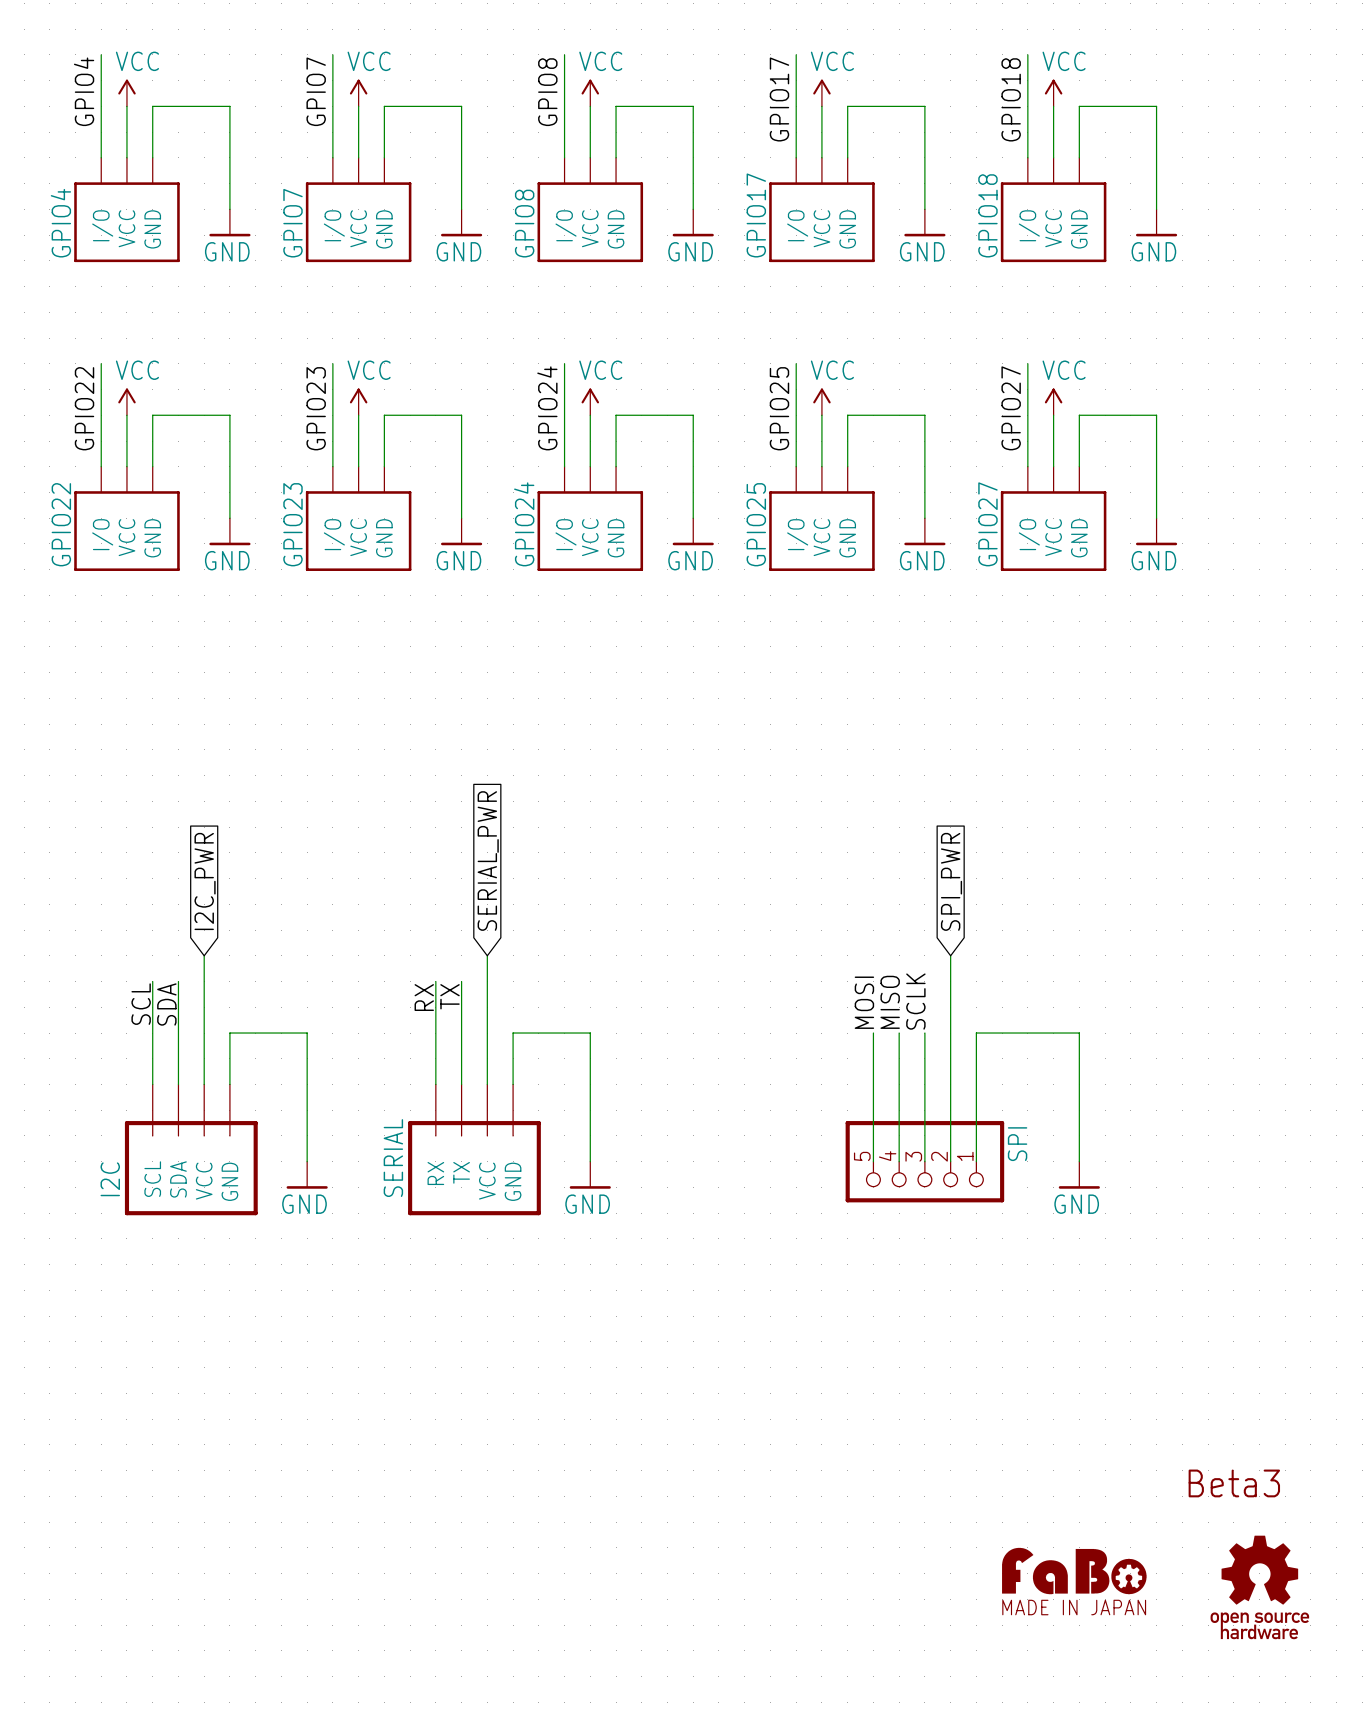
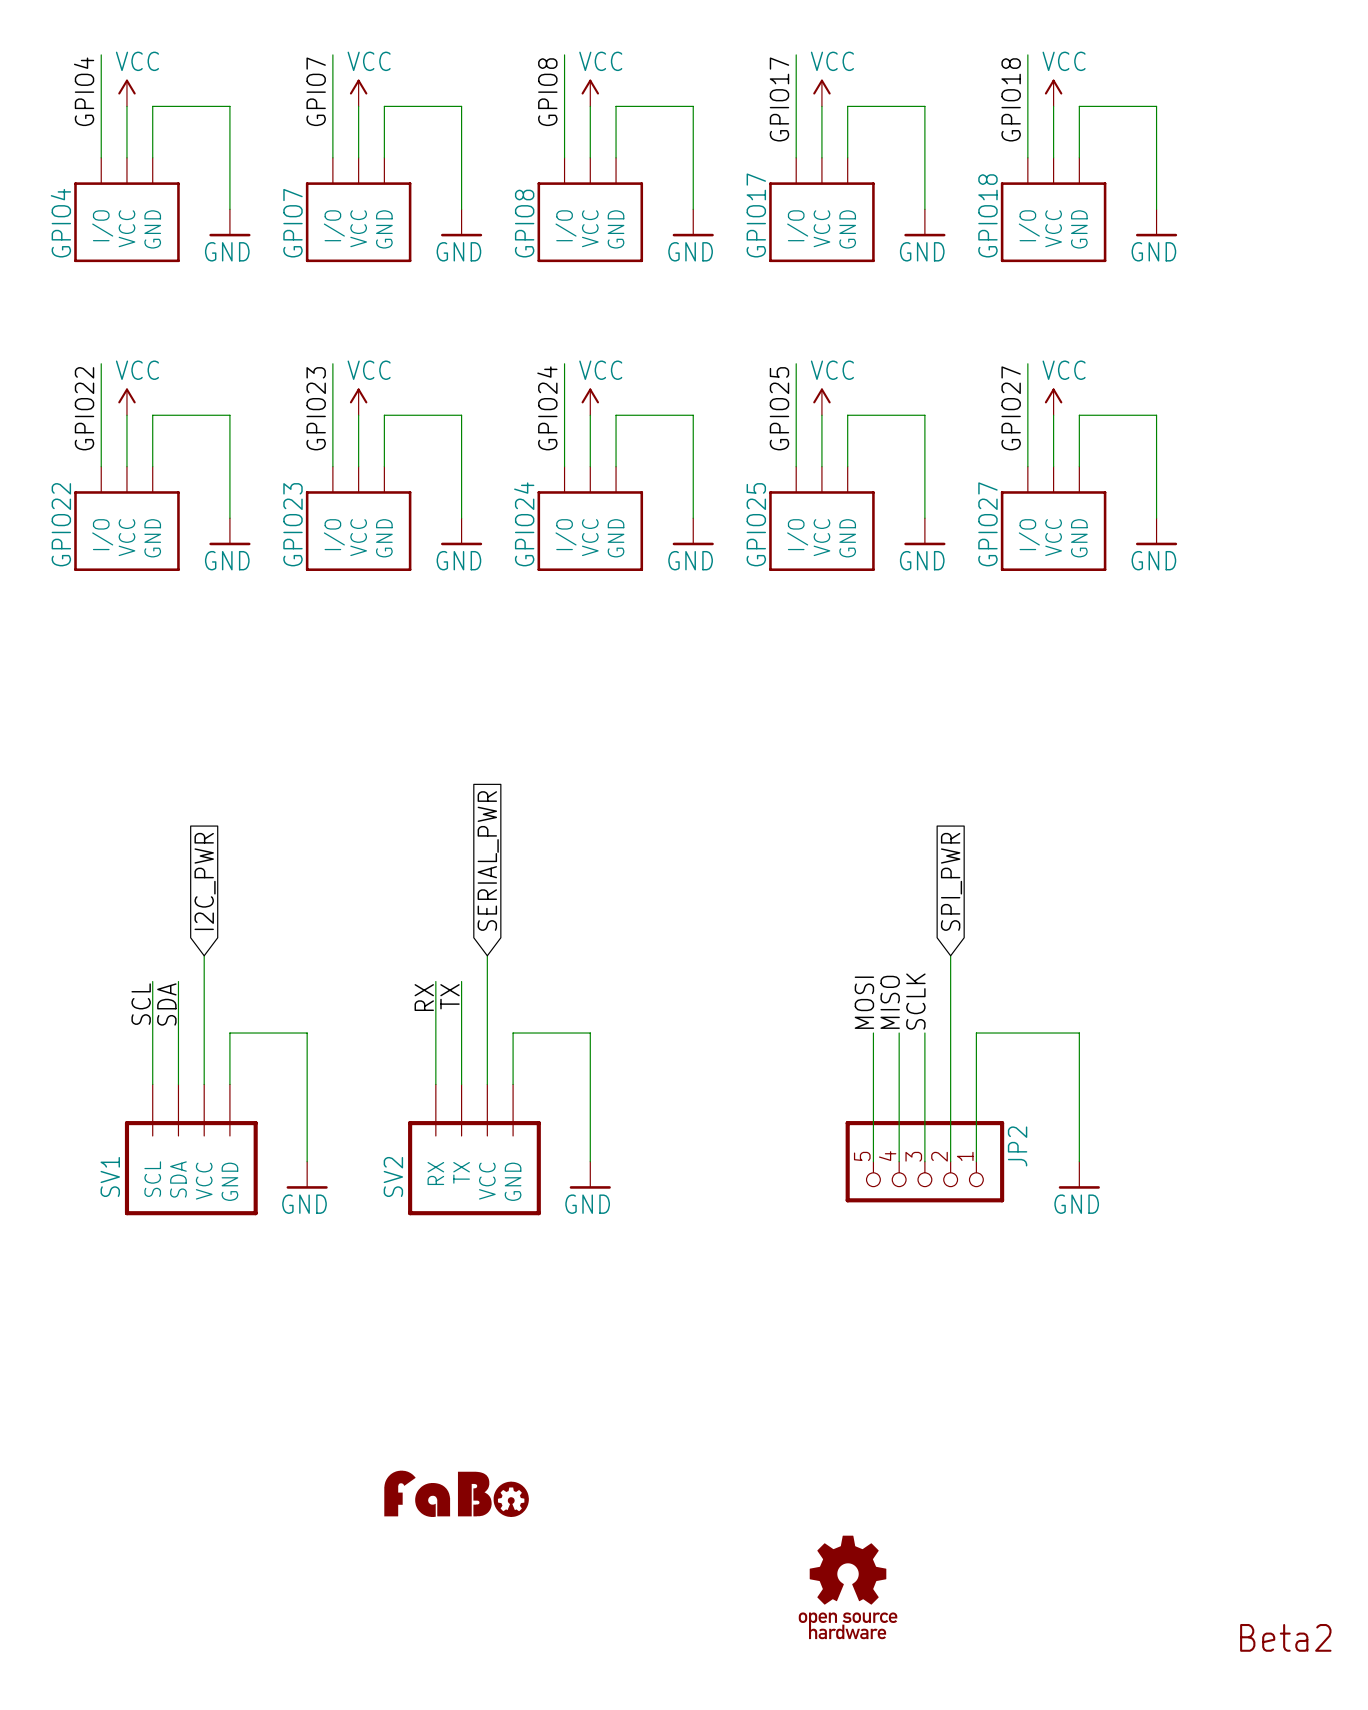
SPI name: SPI (1017, 1144) -> JP2 (1017, 1146)
SERIAL name: SERIAL (393, 1158) -> SV2 (393, 1176)
I2C name: I2C (110, 1179) -> SV1 (110, 1176)
text: Beta3 (1234, 1483) -> none
part: none -> (456, 1493)
part: (1074, 1571) -> none
part: none -> (848, 1587)
part: (1259, 1587) -> none
text: MADE IN JAPAN (1074, 1607) -> none
text: none -> Beta2 (1285, 1637)

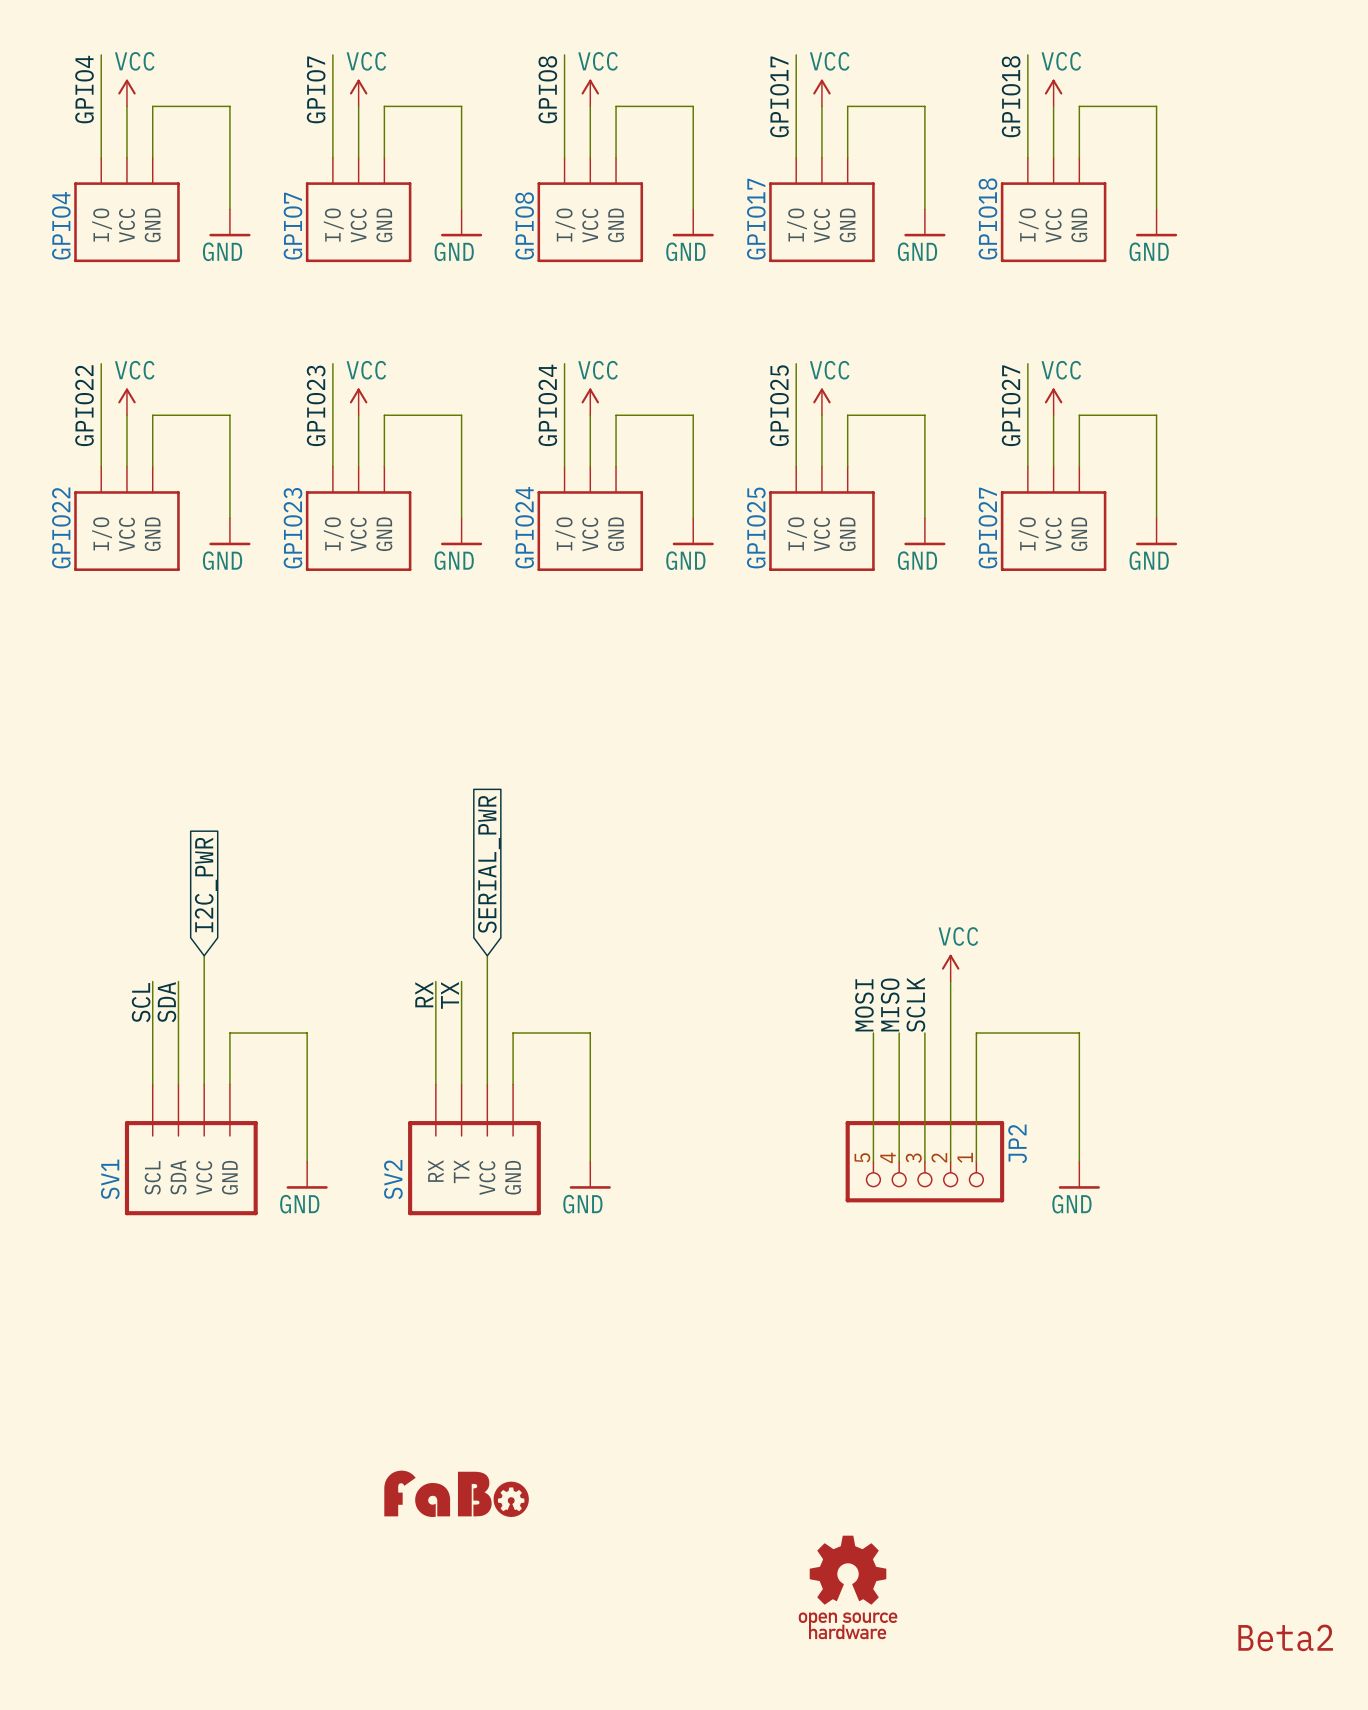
global label: SPI_PWR (951, 881) -> none
power symbol: none -> VCC (950, 968)

